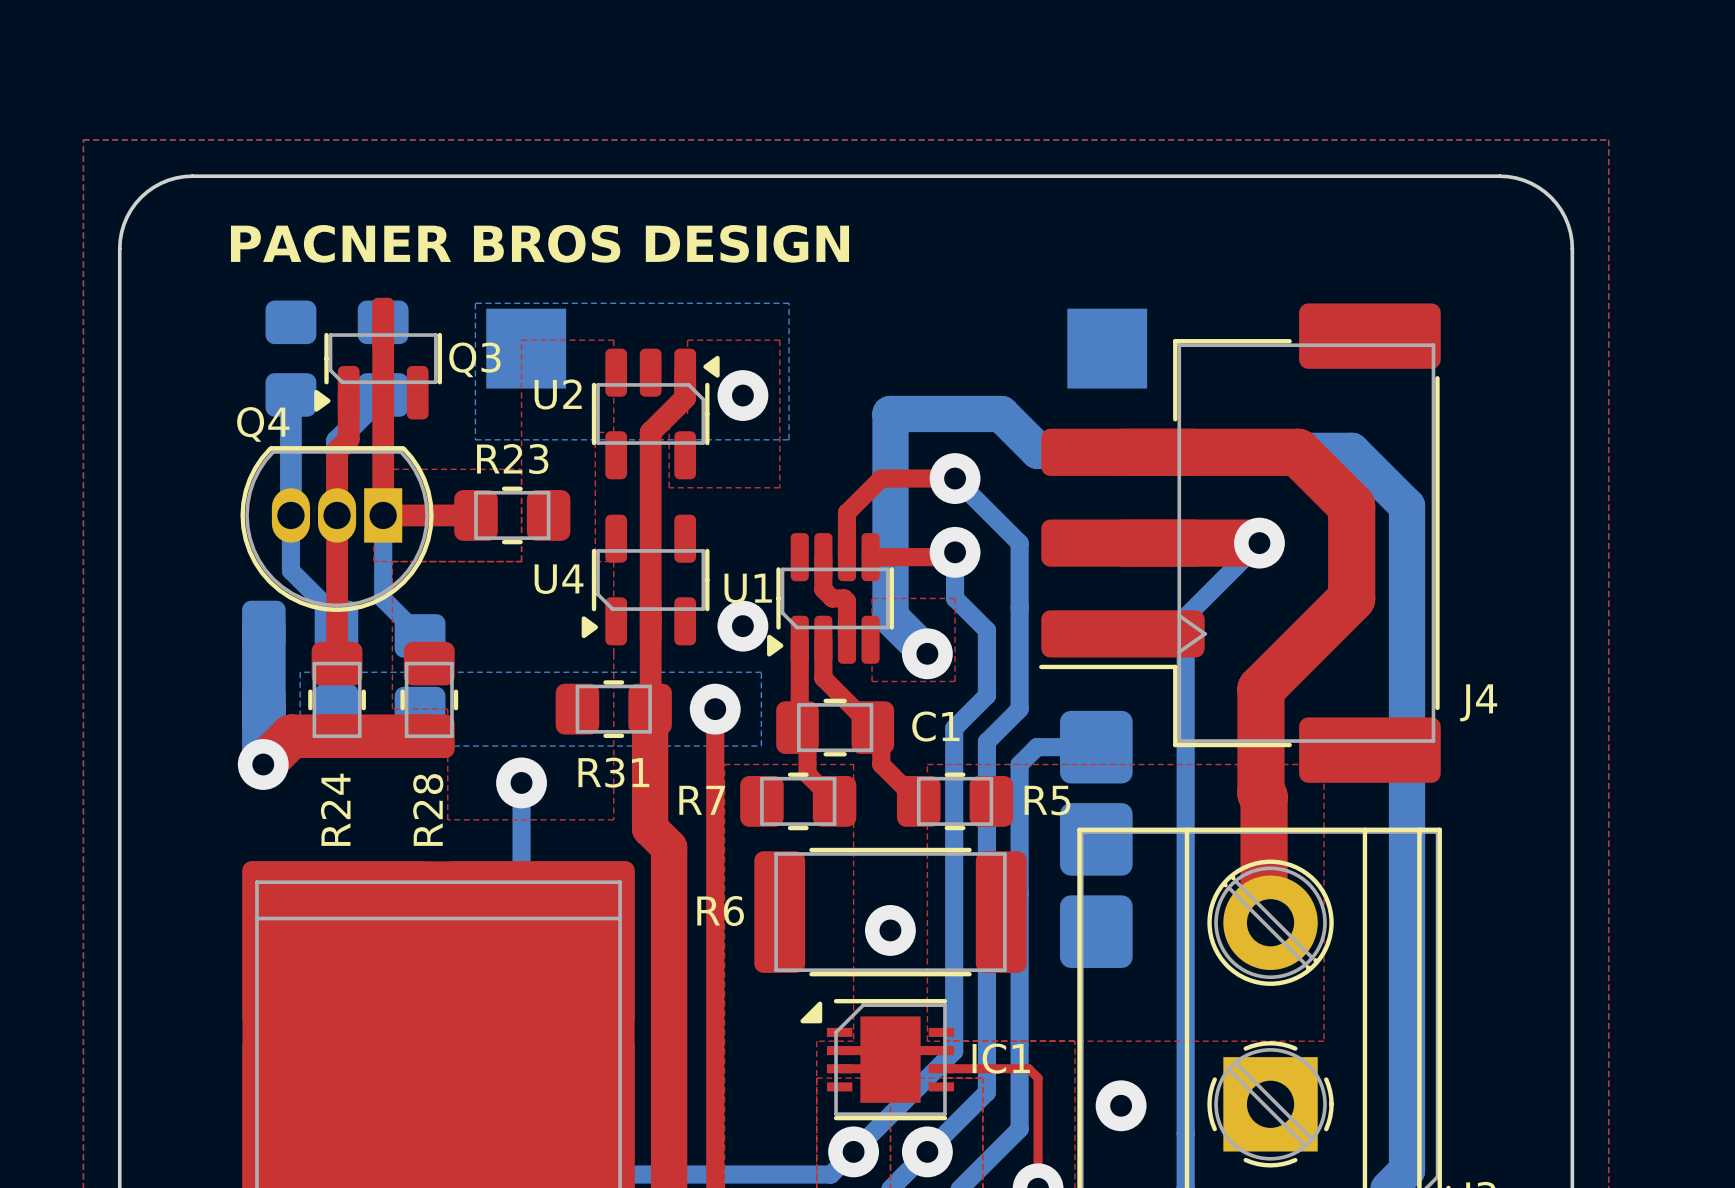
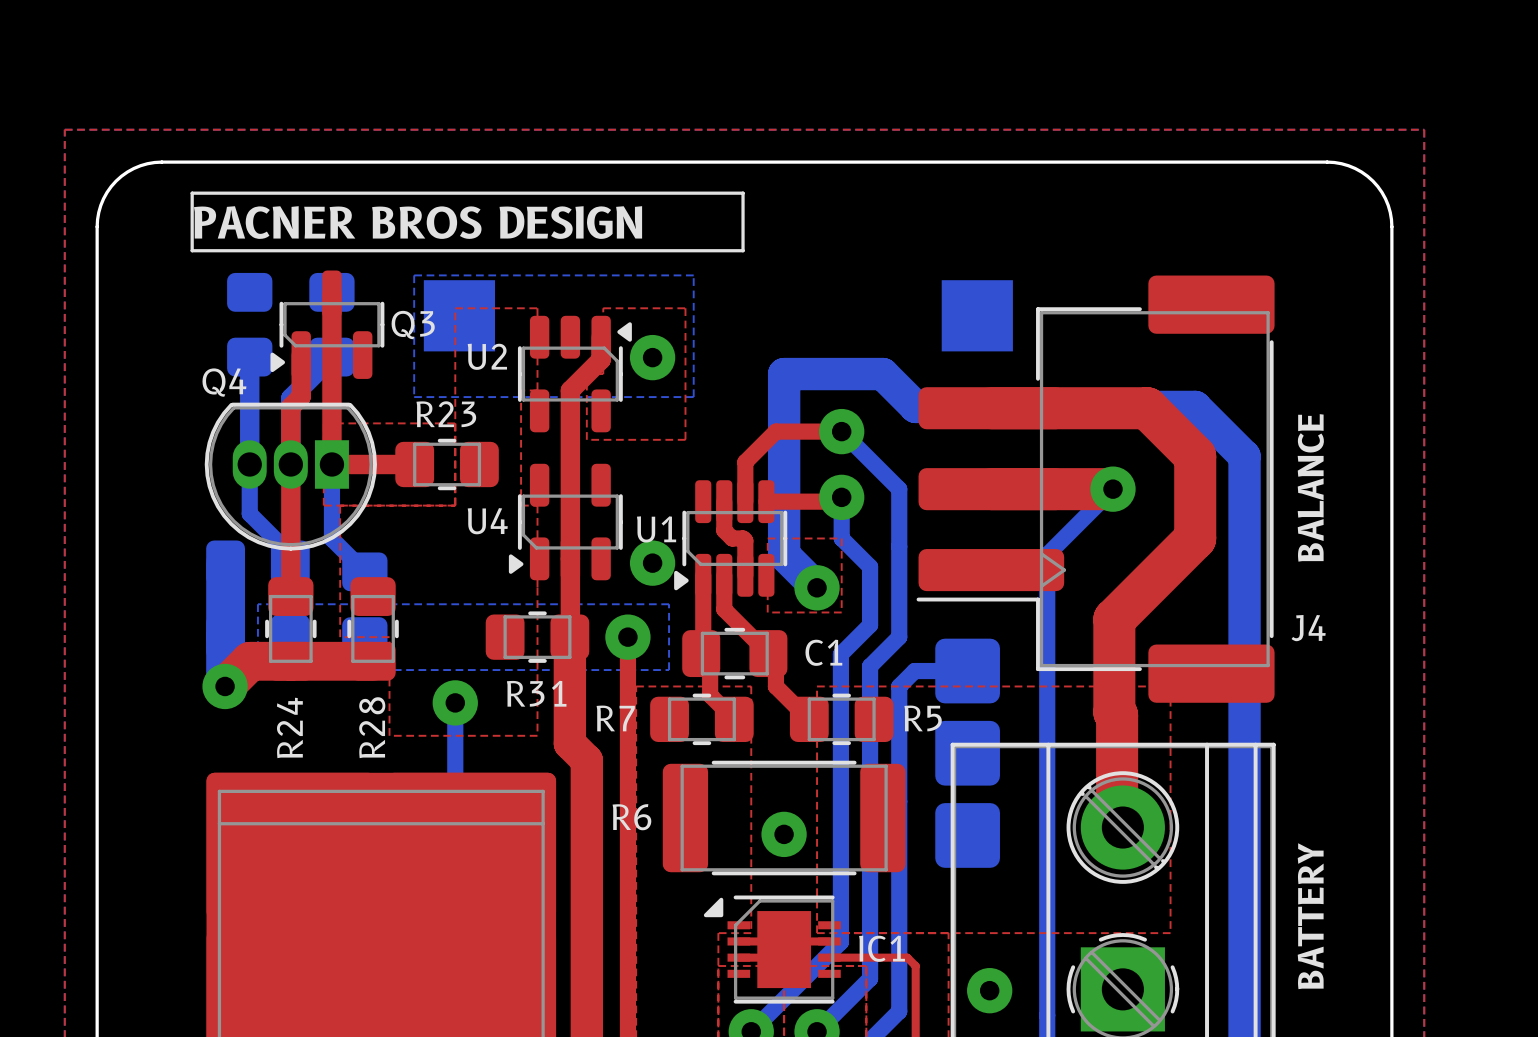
line: none -> (192, 193) (743, 193) (743, 250) (192, 250) (192, 193)
text: none -> BALANCE (1310, 487)
text: none -> BATTERY (1310, 916)

